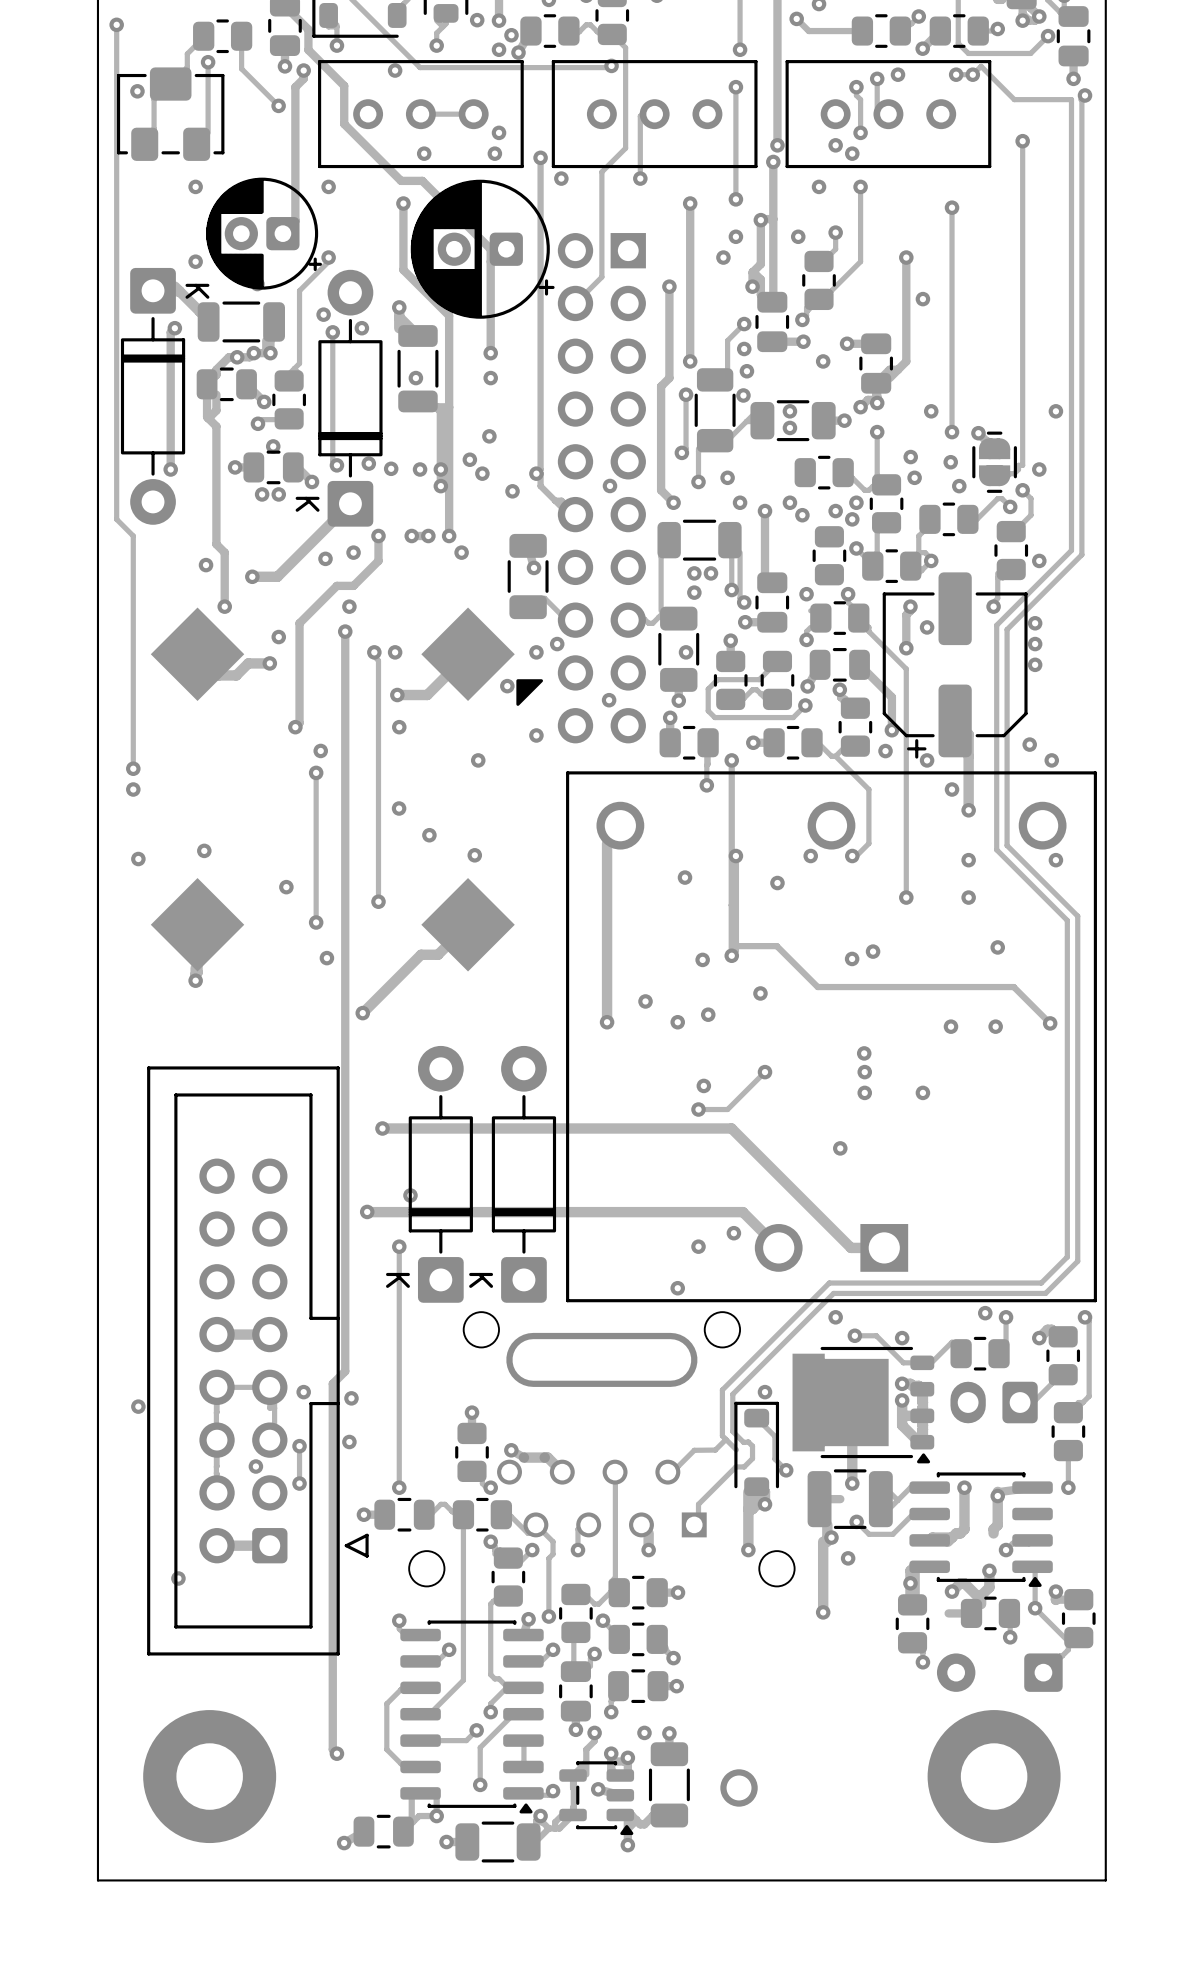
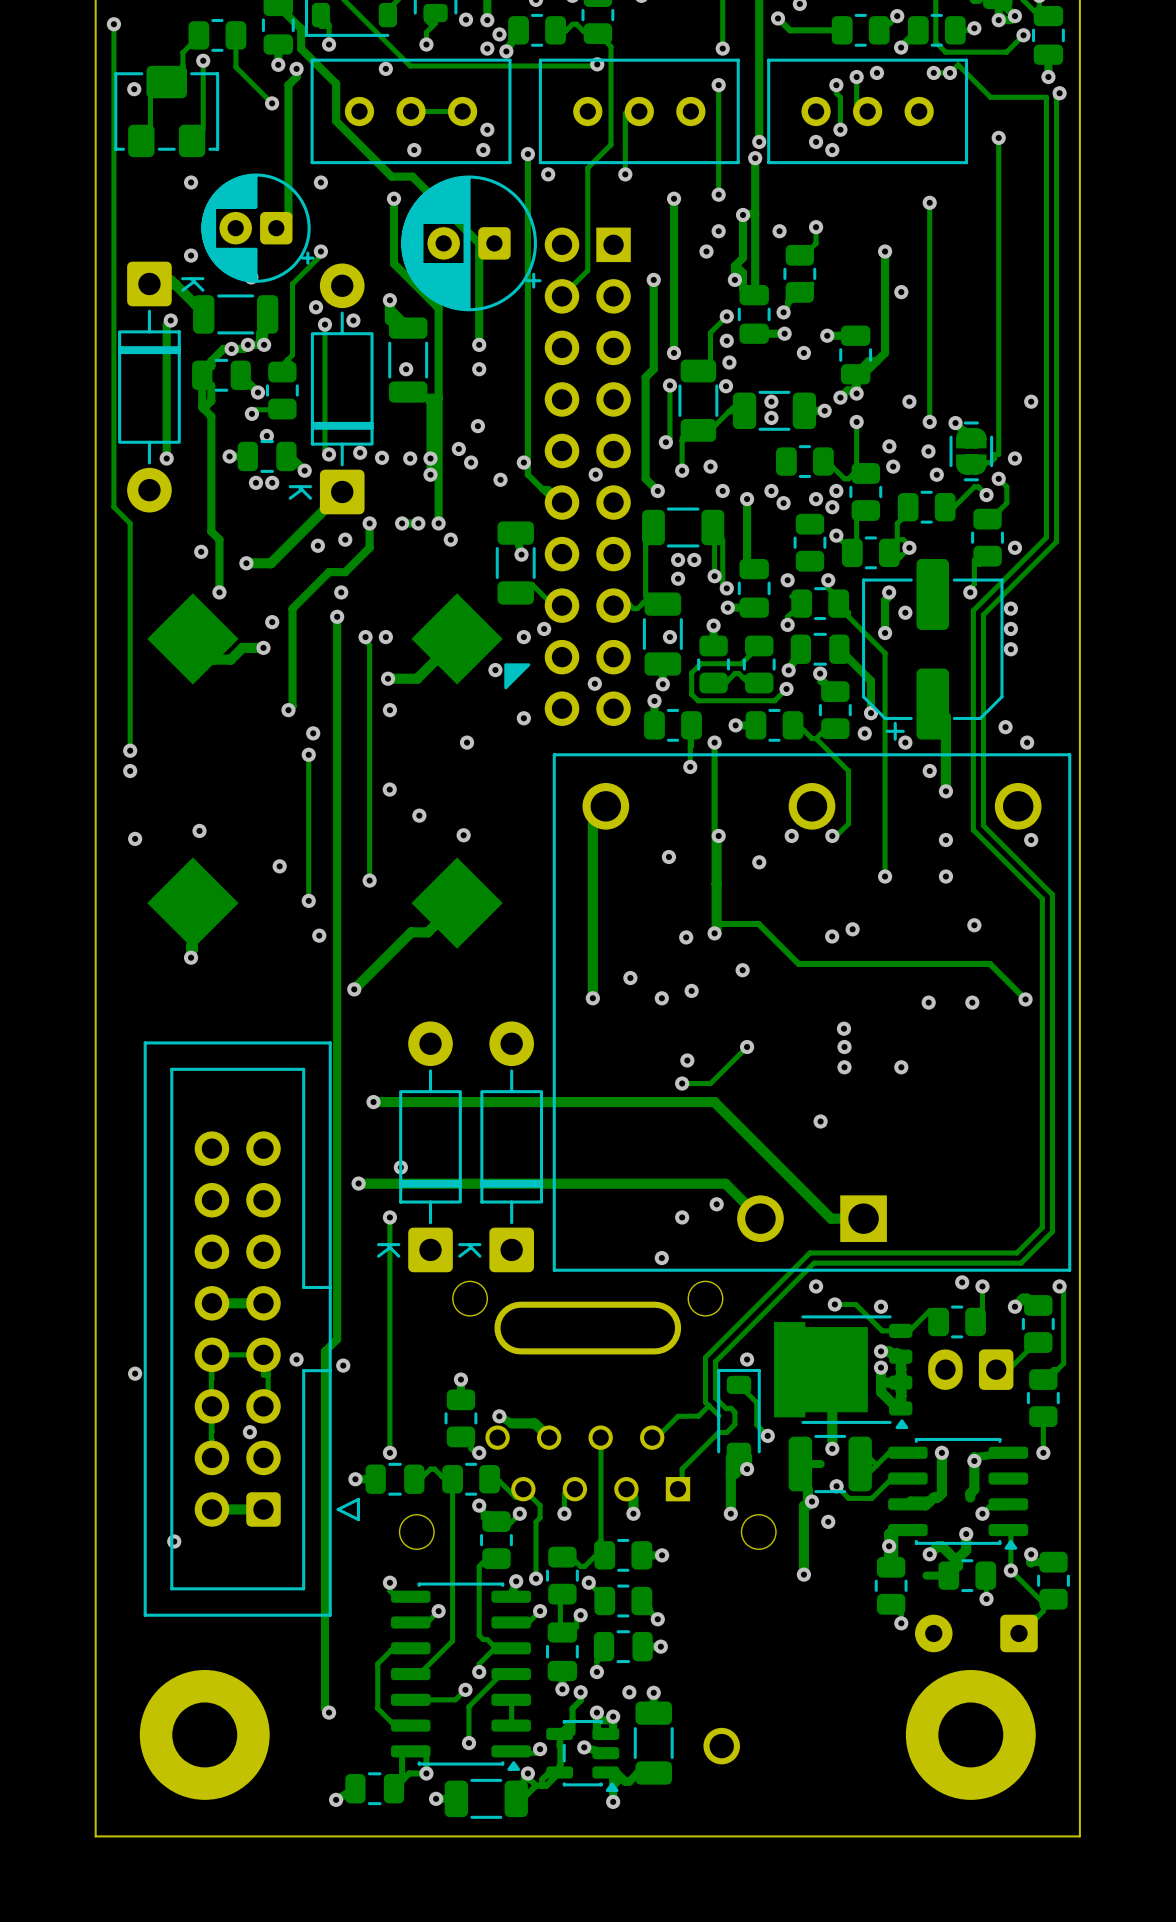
via: (819, 186) -> none
track: (860, 186) (860, 261) (831, 290) -> none
via: (860, 186) -> none
via: (349, 1441) -> none
track: (299, 1446) (299, 1483) -> none
via: (299, 1446) -> none
via: (299, 1483) -> none

